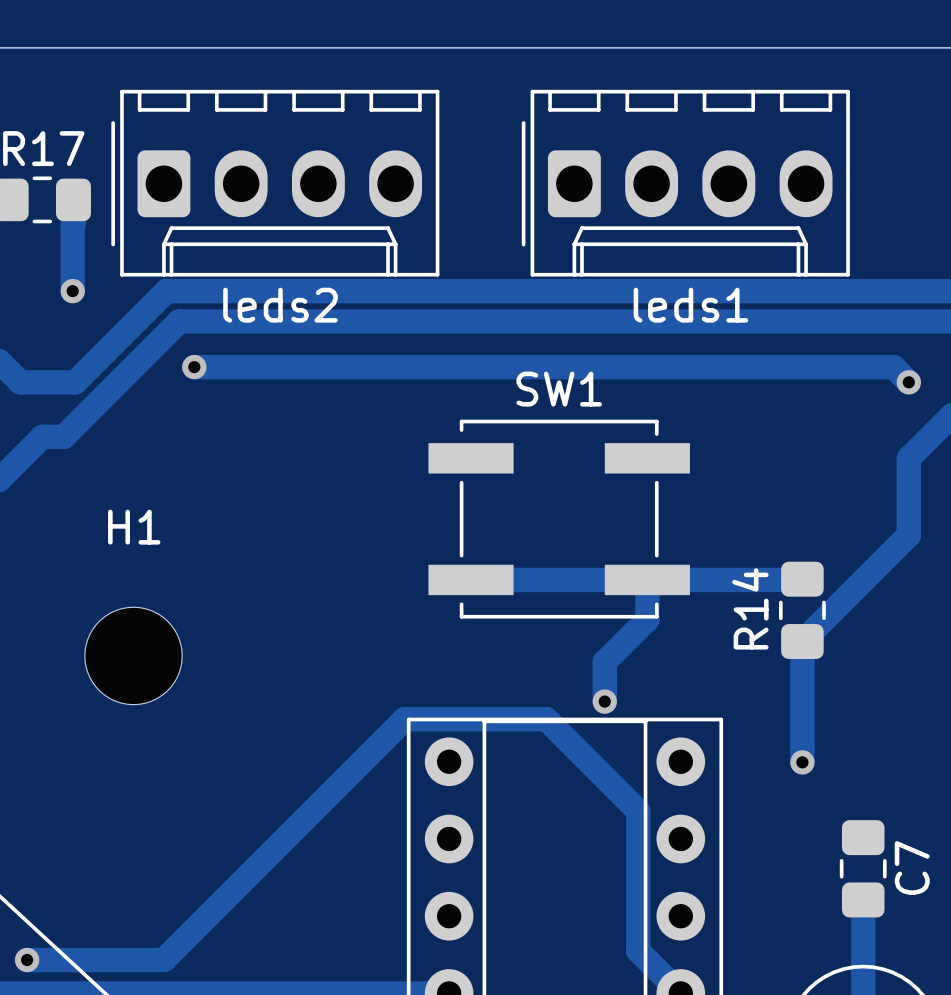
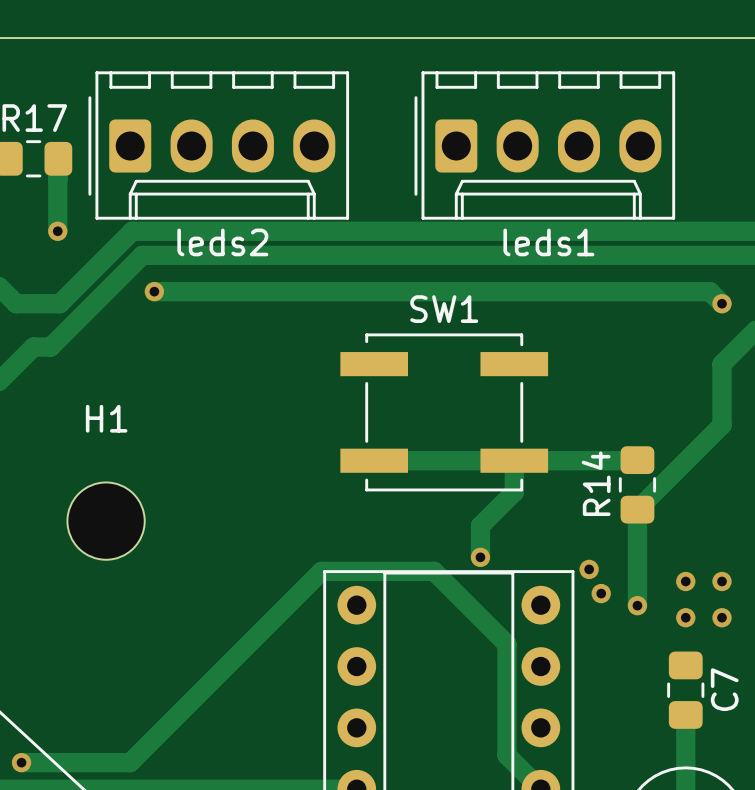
via: none -> (589, 569)
via: none -> (685, 581)
via: none -> (722, 581)
via: none -> (601, 593)
via: none -> (685, 617)
via: none -> (722, 617)

